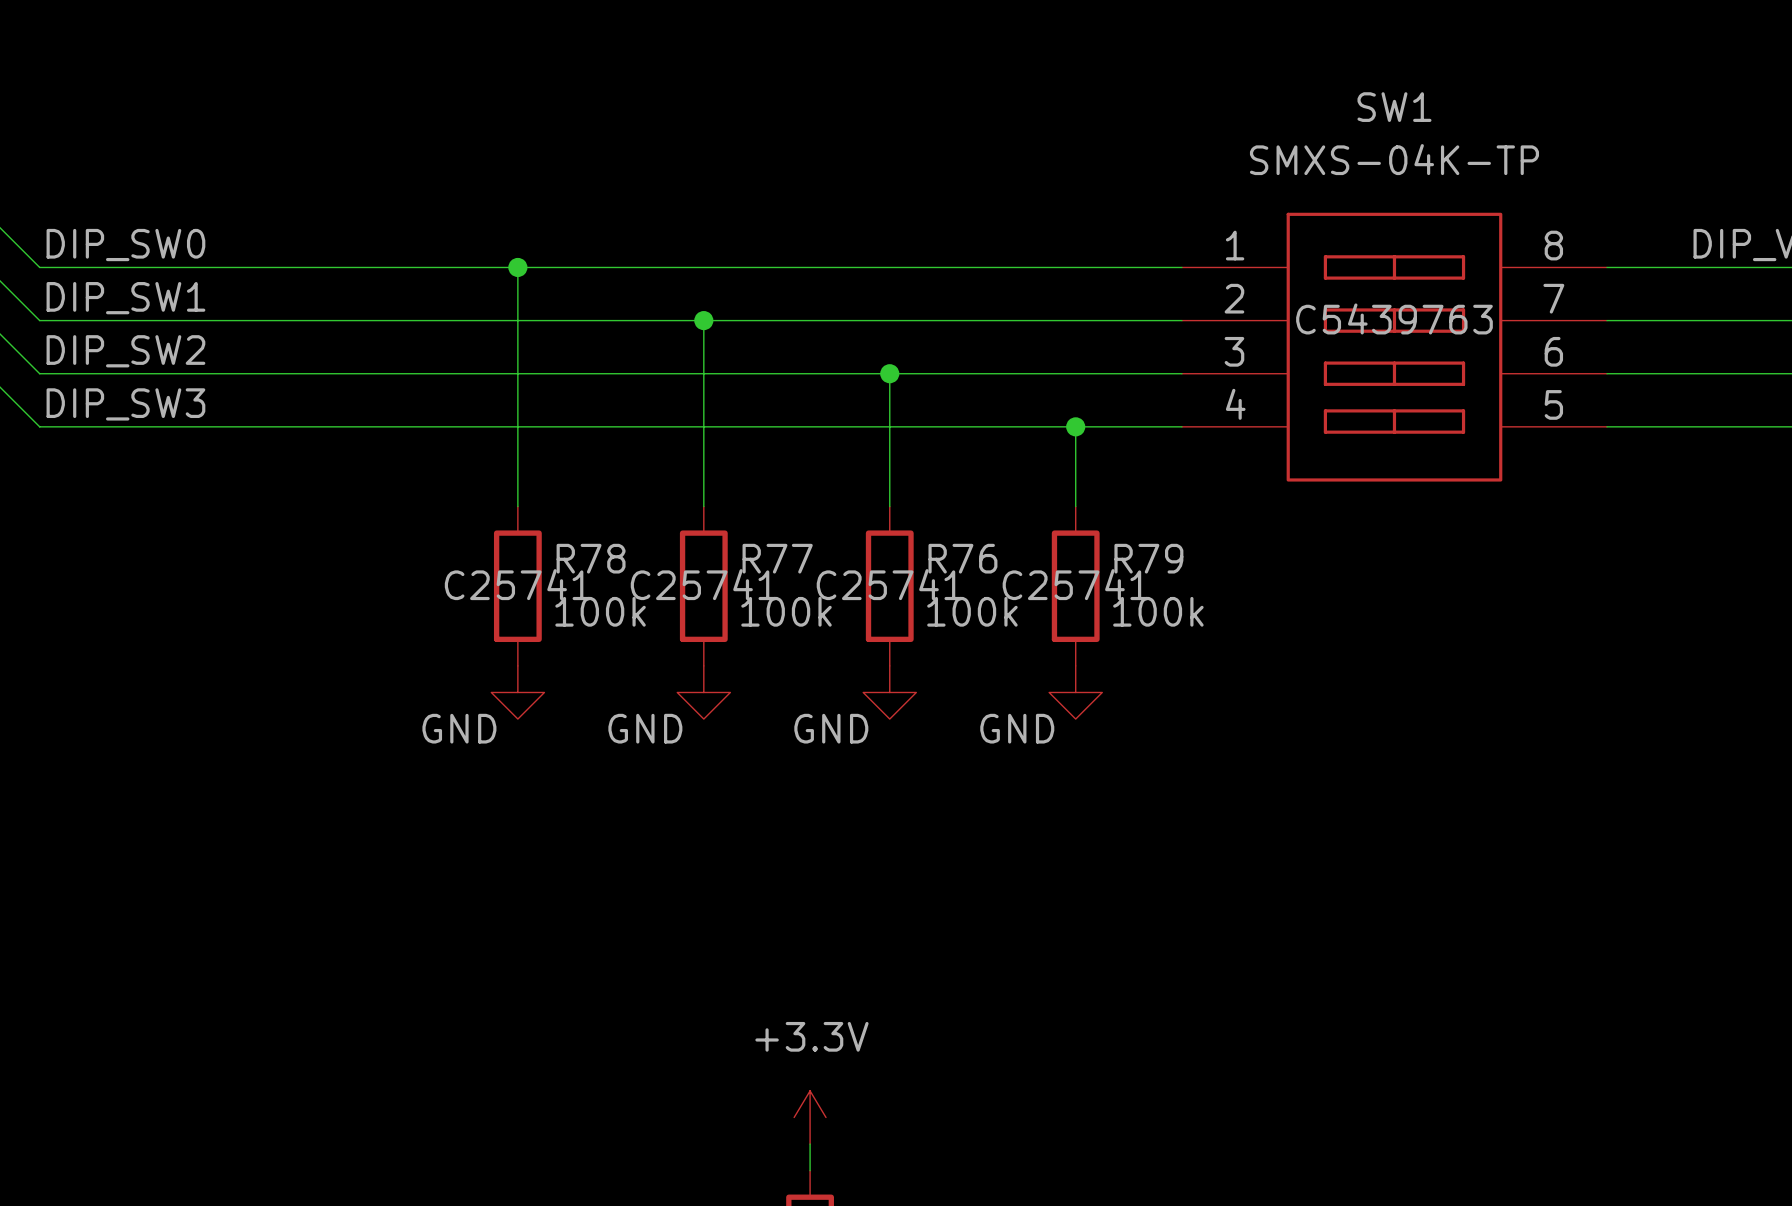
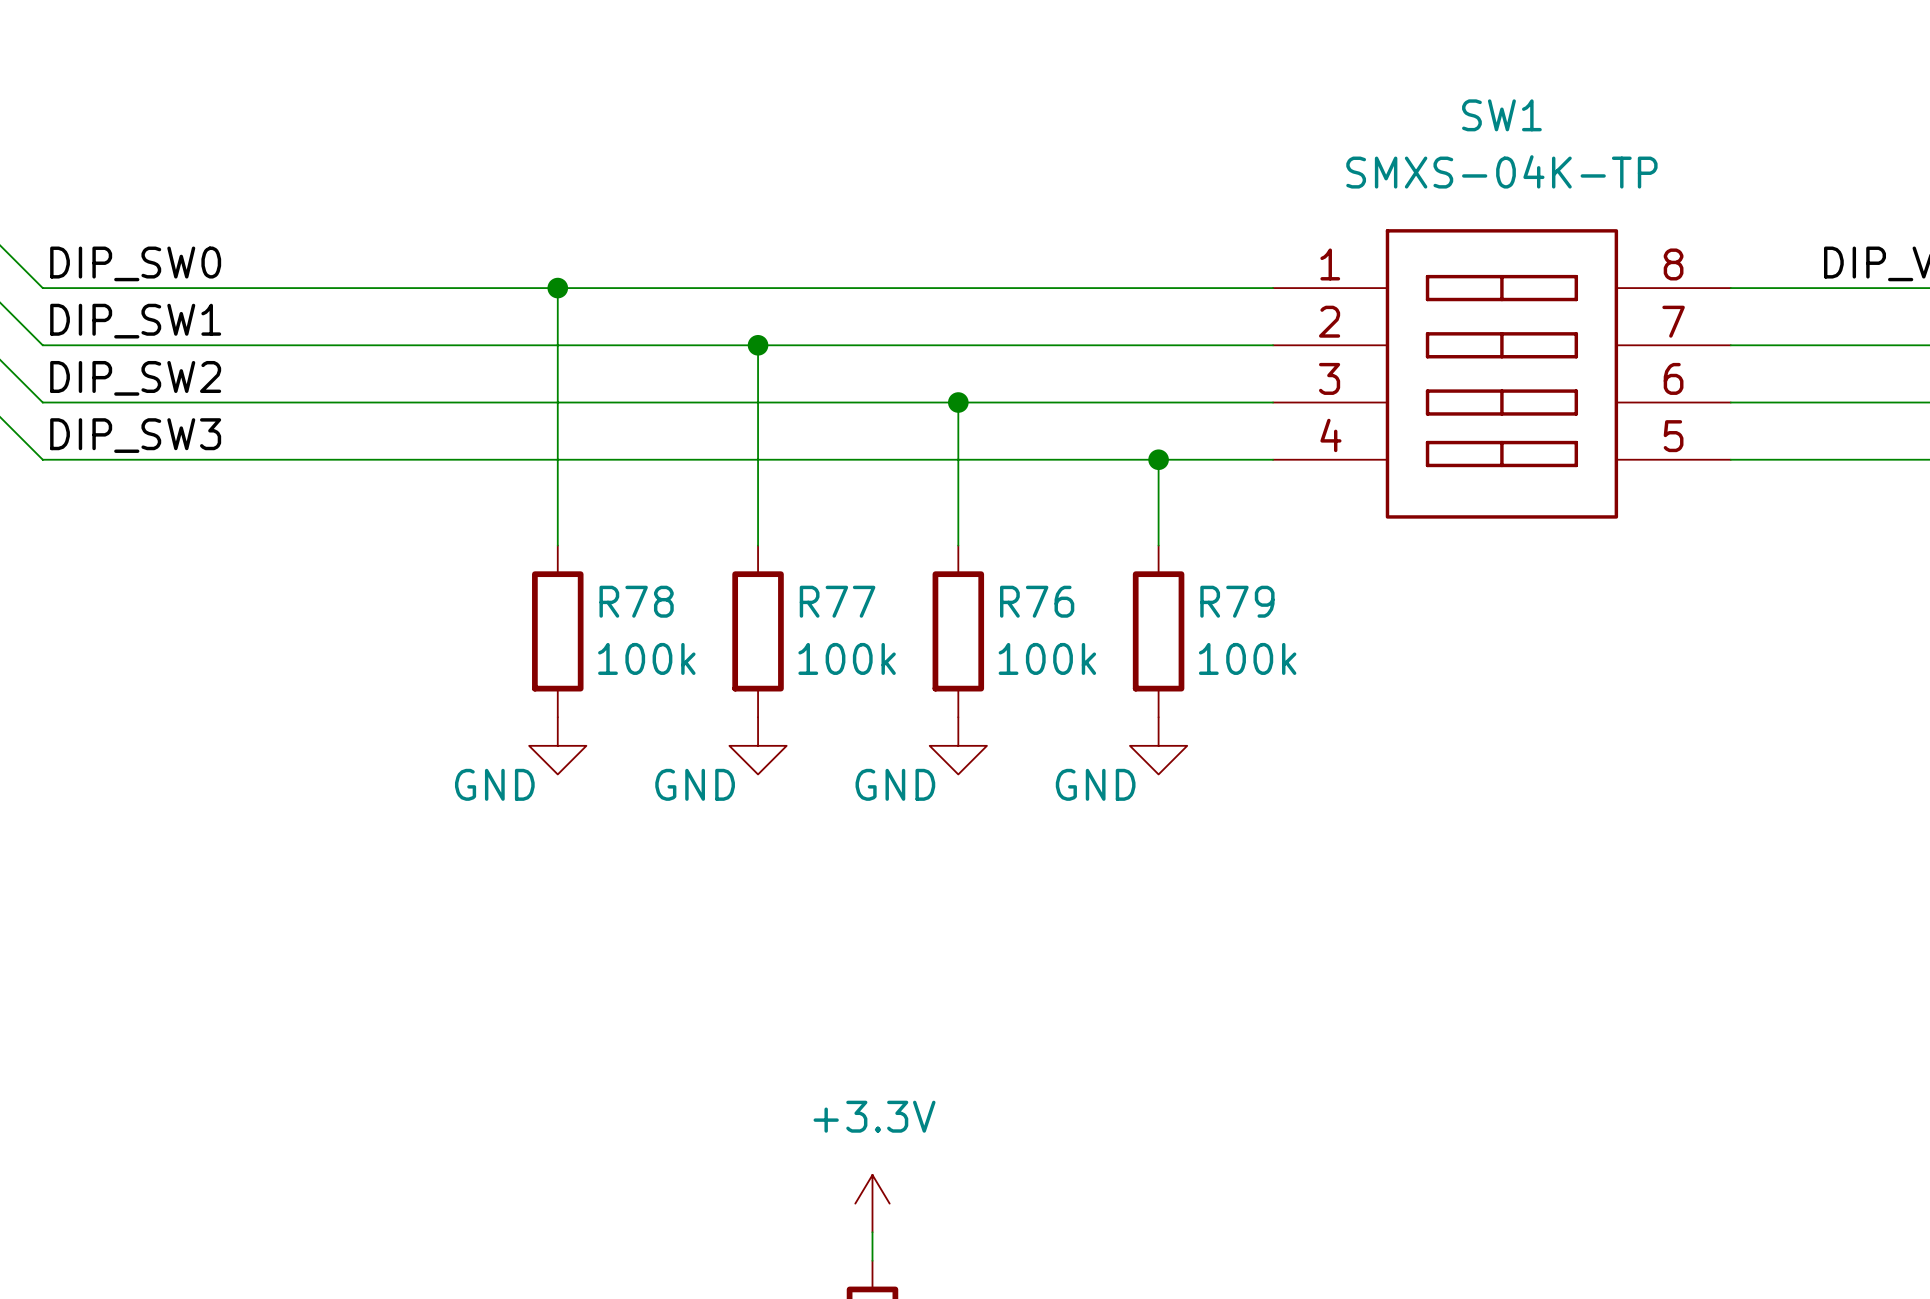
SW1 text: C5439763 (1394, 318) -> none
R78 text: C25741 (517, 584) -> none
R77 text: C25741 (703, 584) -> none
R76 text: C25741 (889, 584) -> none
R79 text: C25741 (1075, 584) -> none

